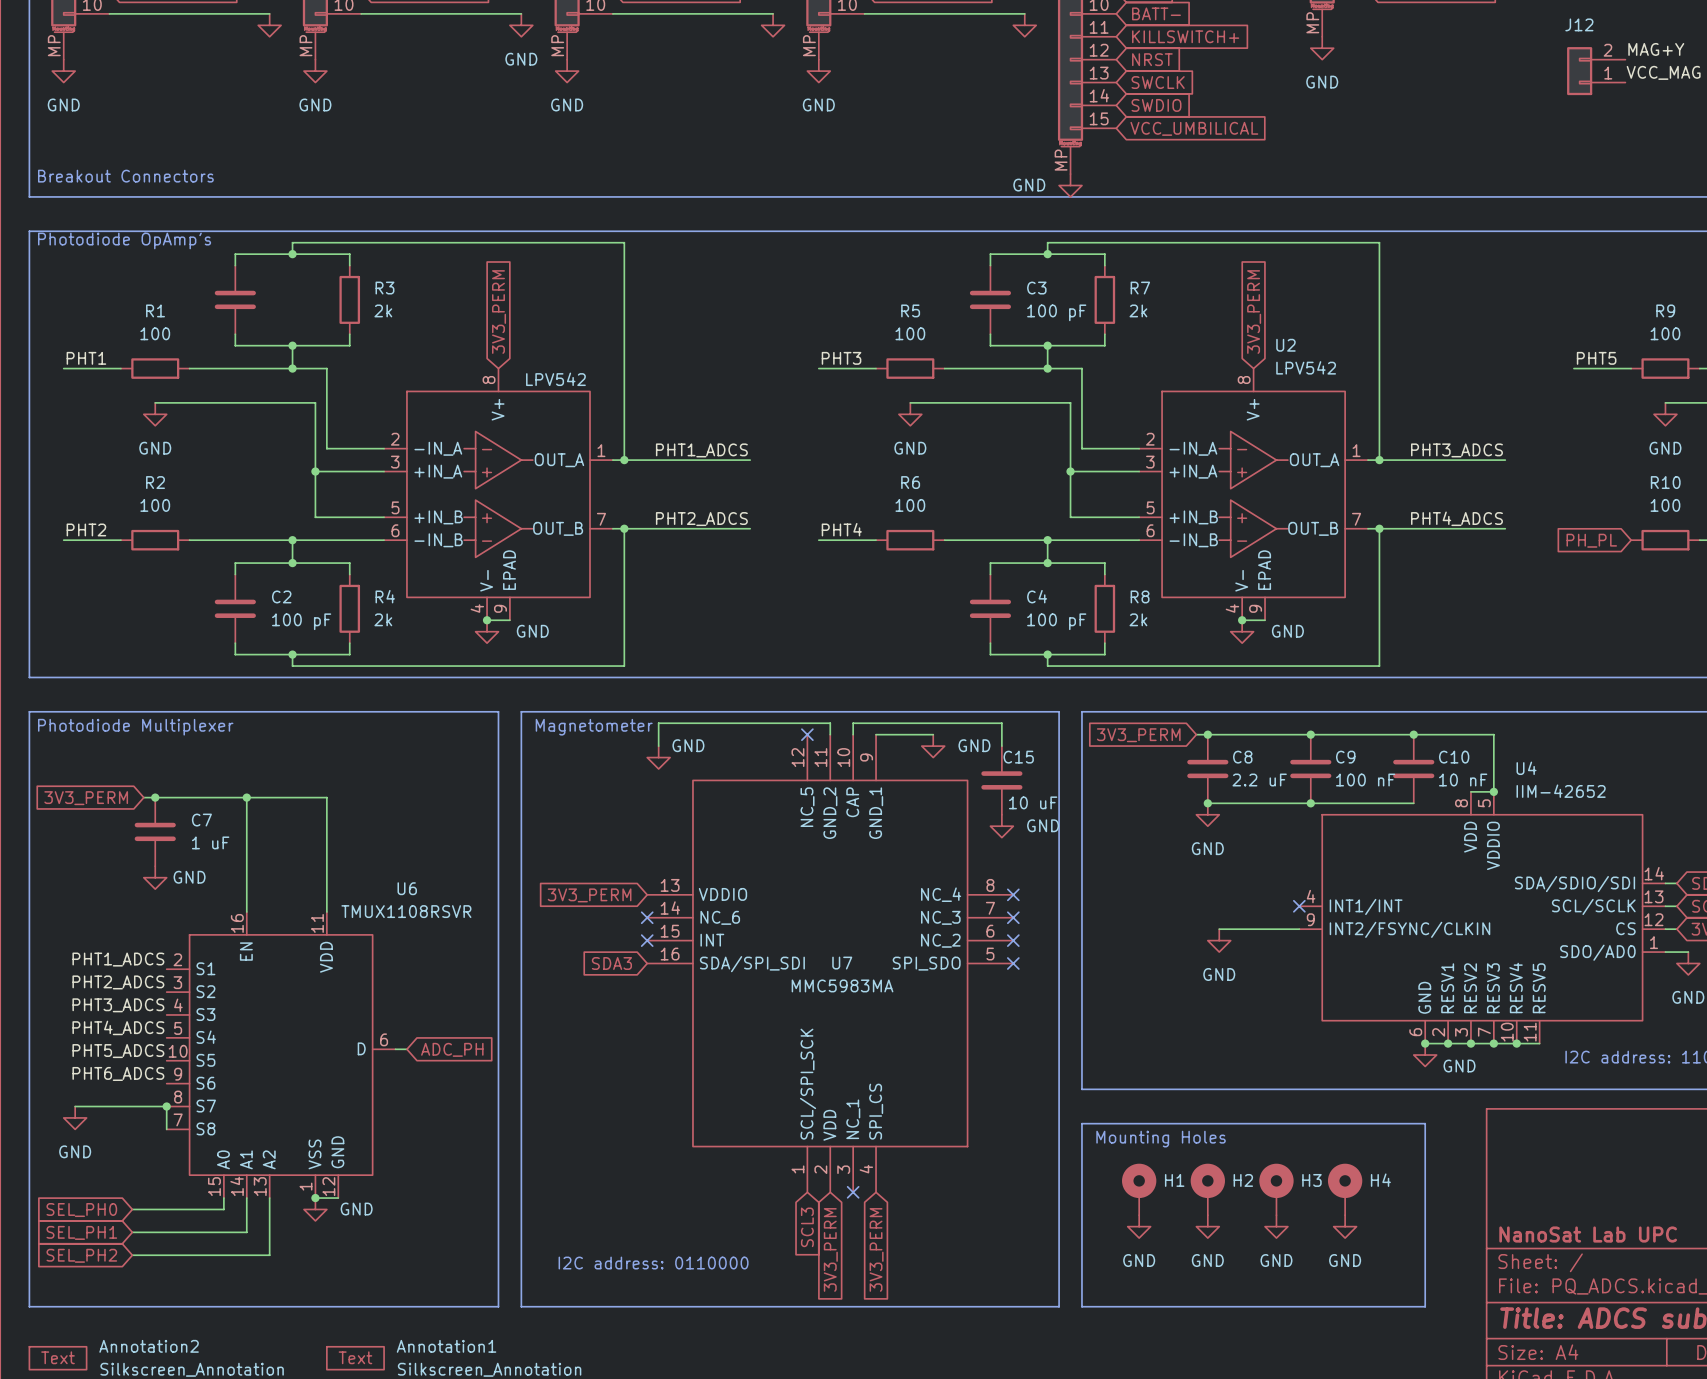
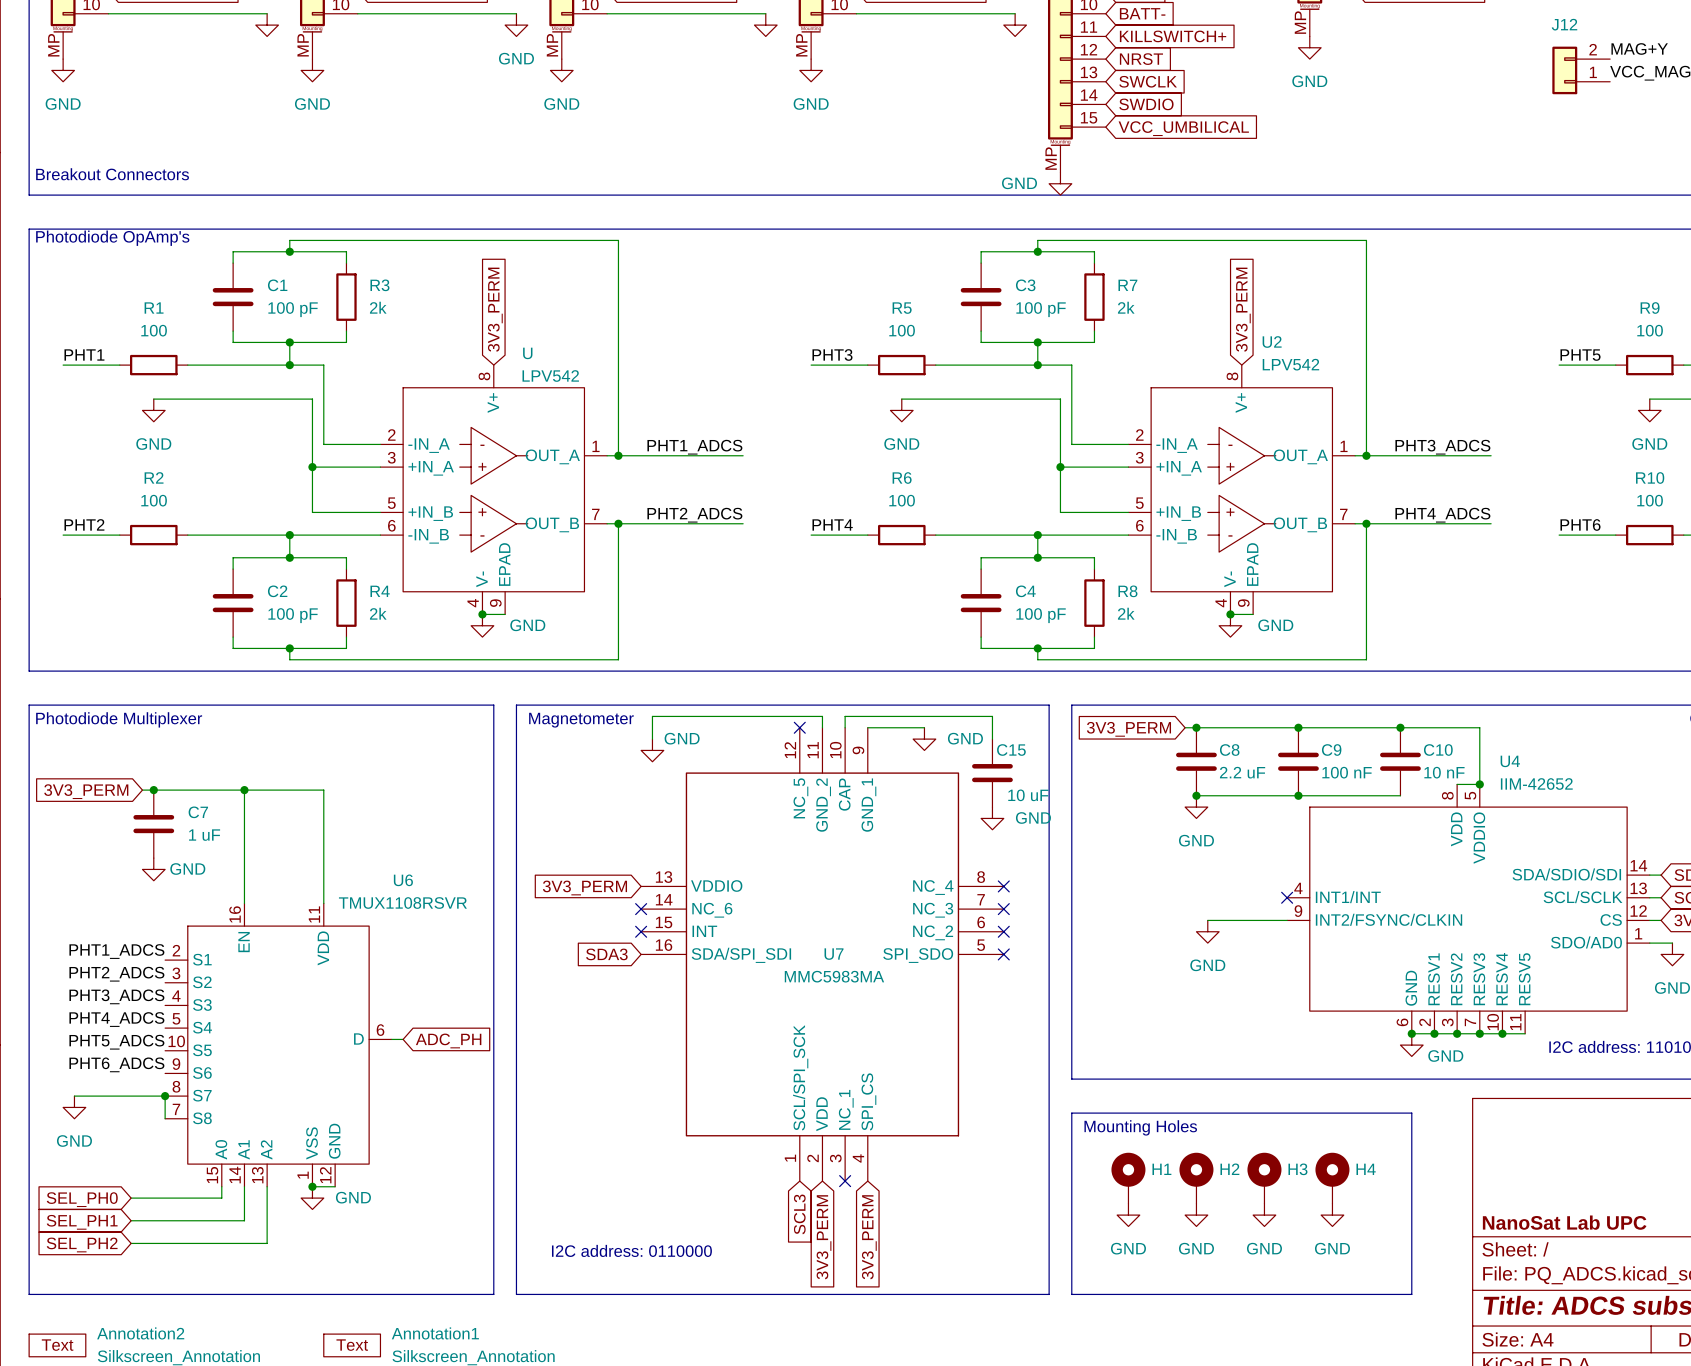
C1 name: none -> C1 (277, 285)
C1 value: none -> 100 pF (293, 309)
U name: none -> U (527, 353)
label: none -> PHT6 (1580, 524)
wire: none -> (1559, 535) (1615, 535)
global label: PH_PL (1591, 540) -> none

